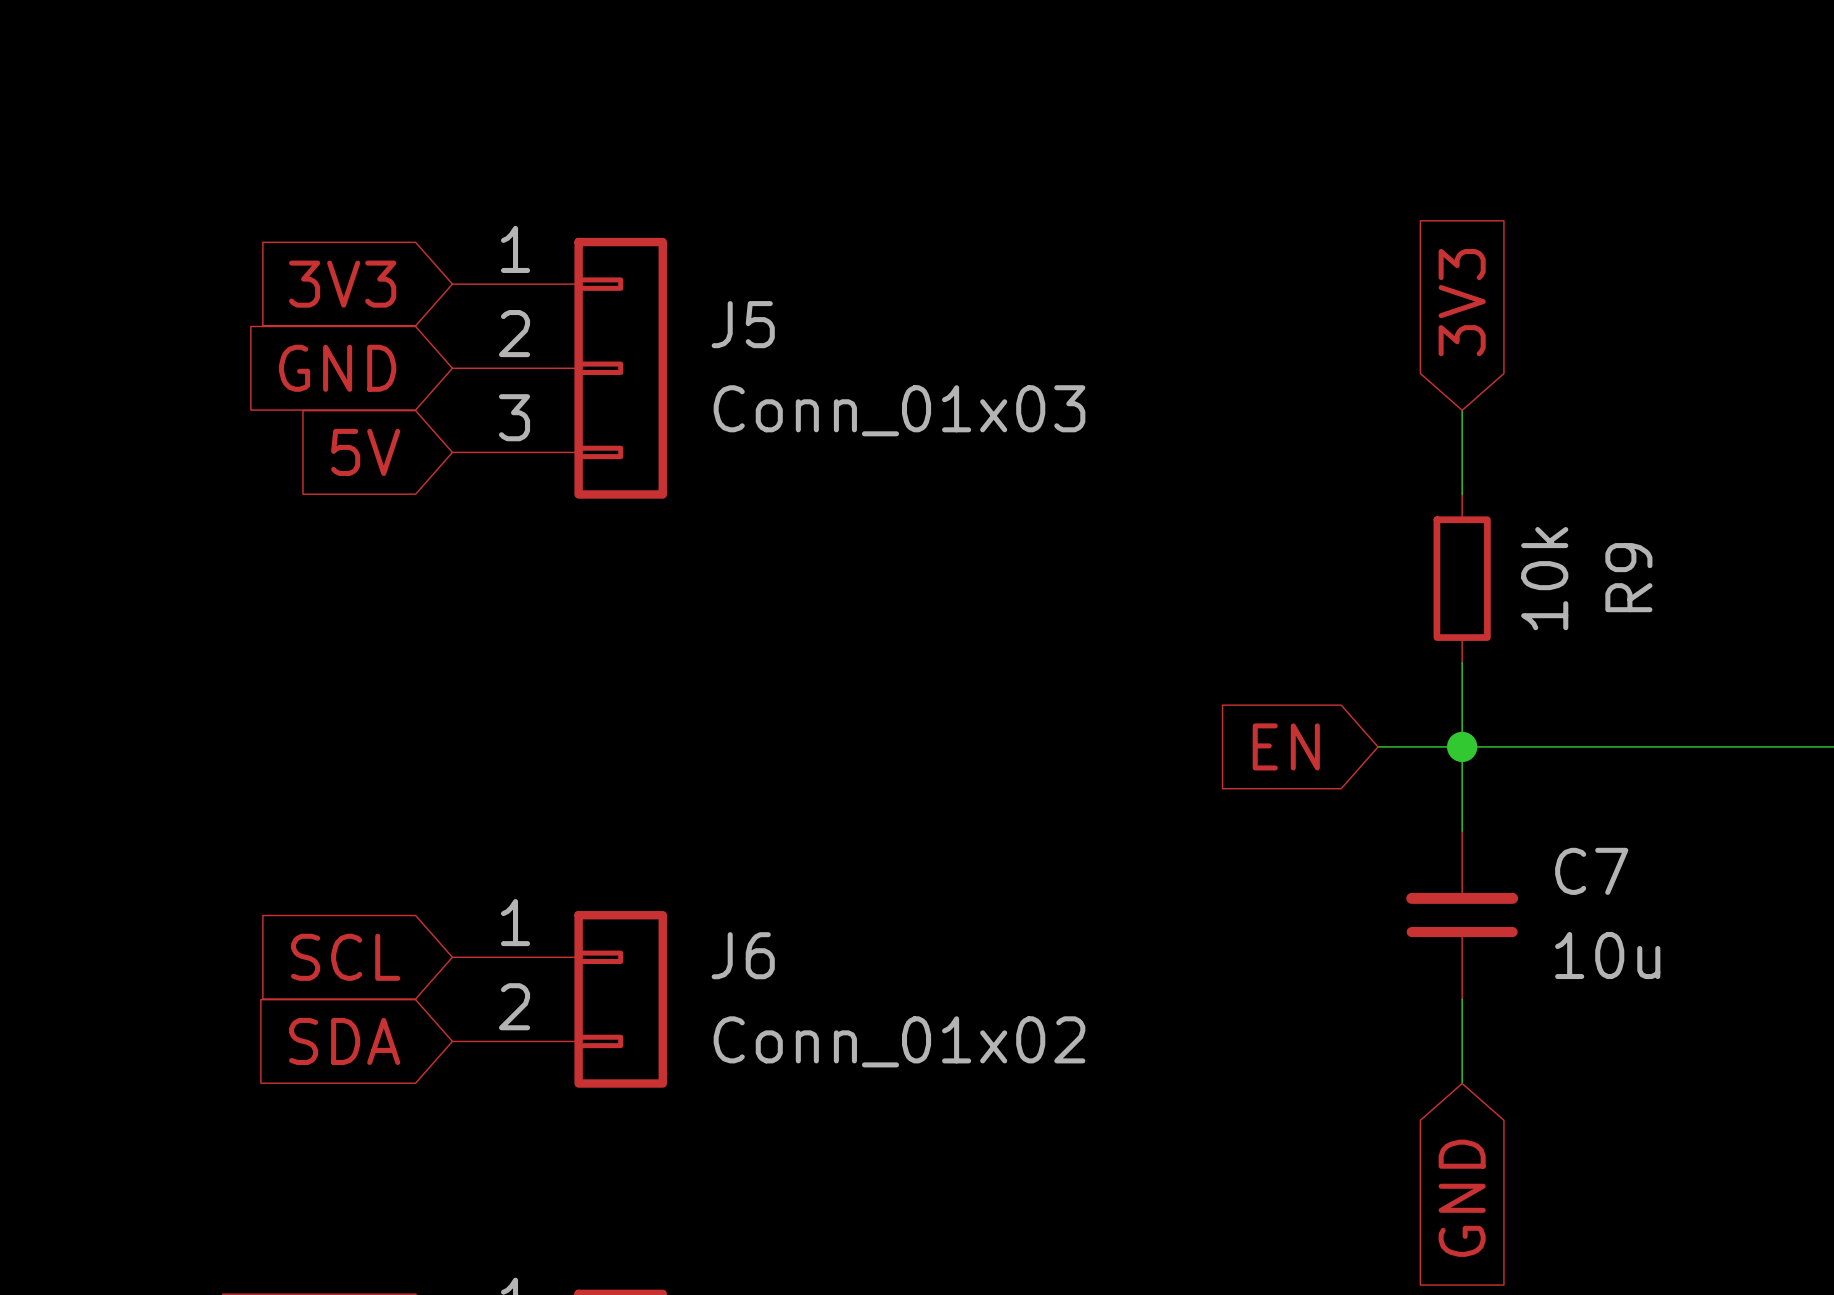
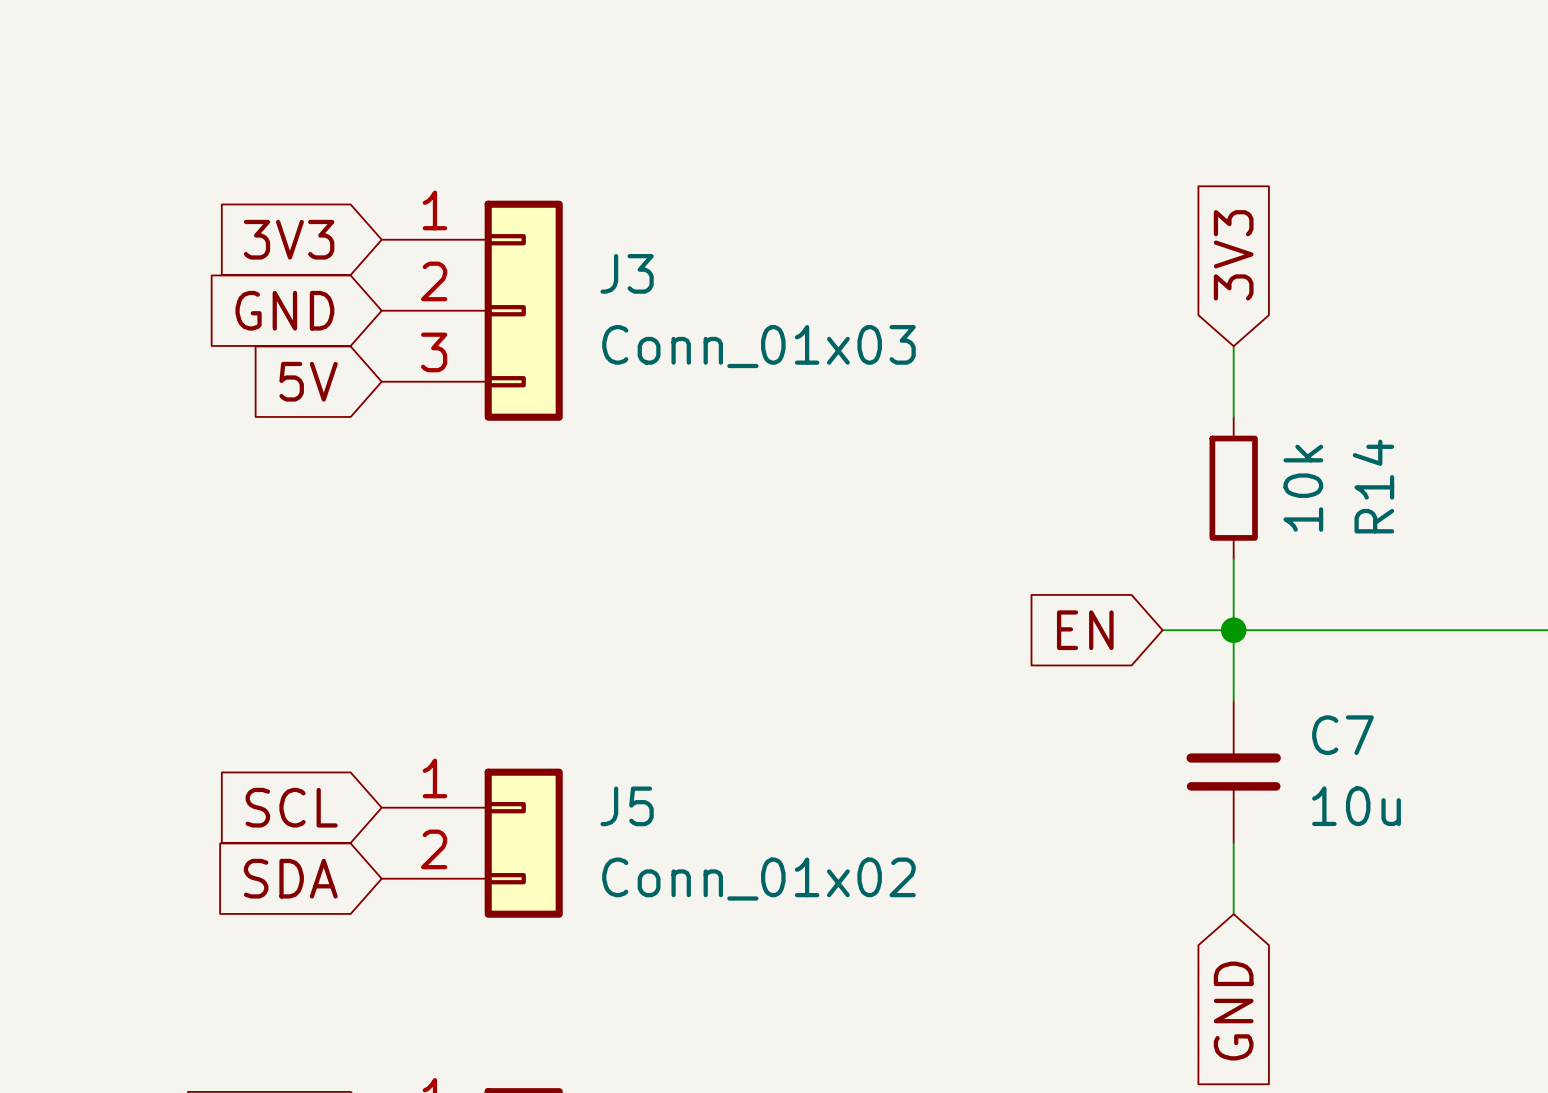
J5 name: J5 (743, 324) -> J3 (627, 273)
R9 name: R9 (1628, 577) -> R14 (1373, 486)
J6 name: J6 (743, 955) -> J5 (627, 806)

